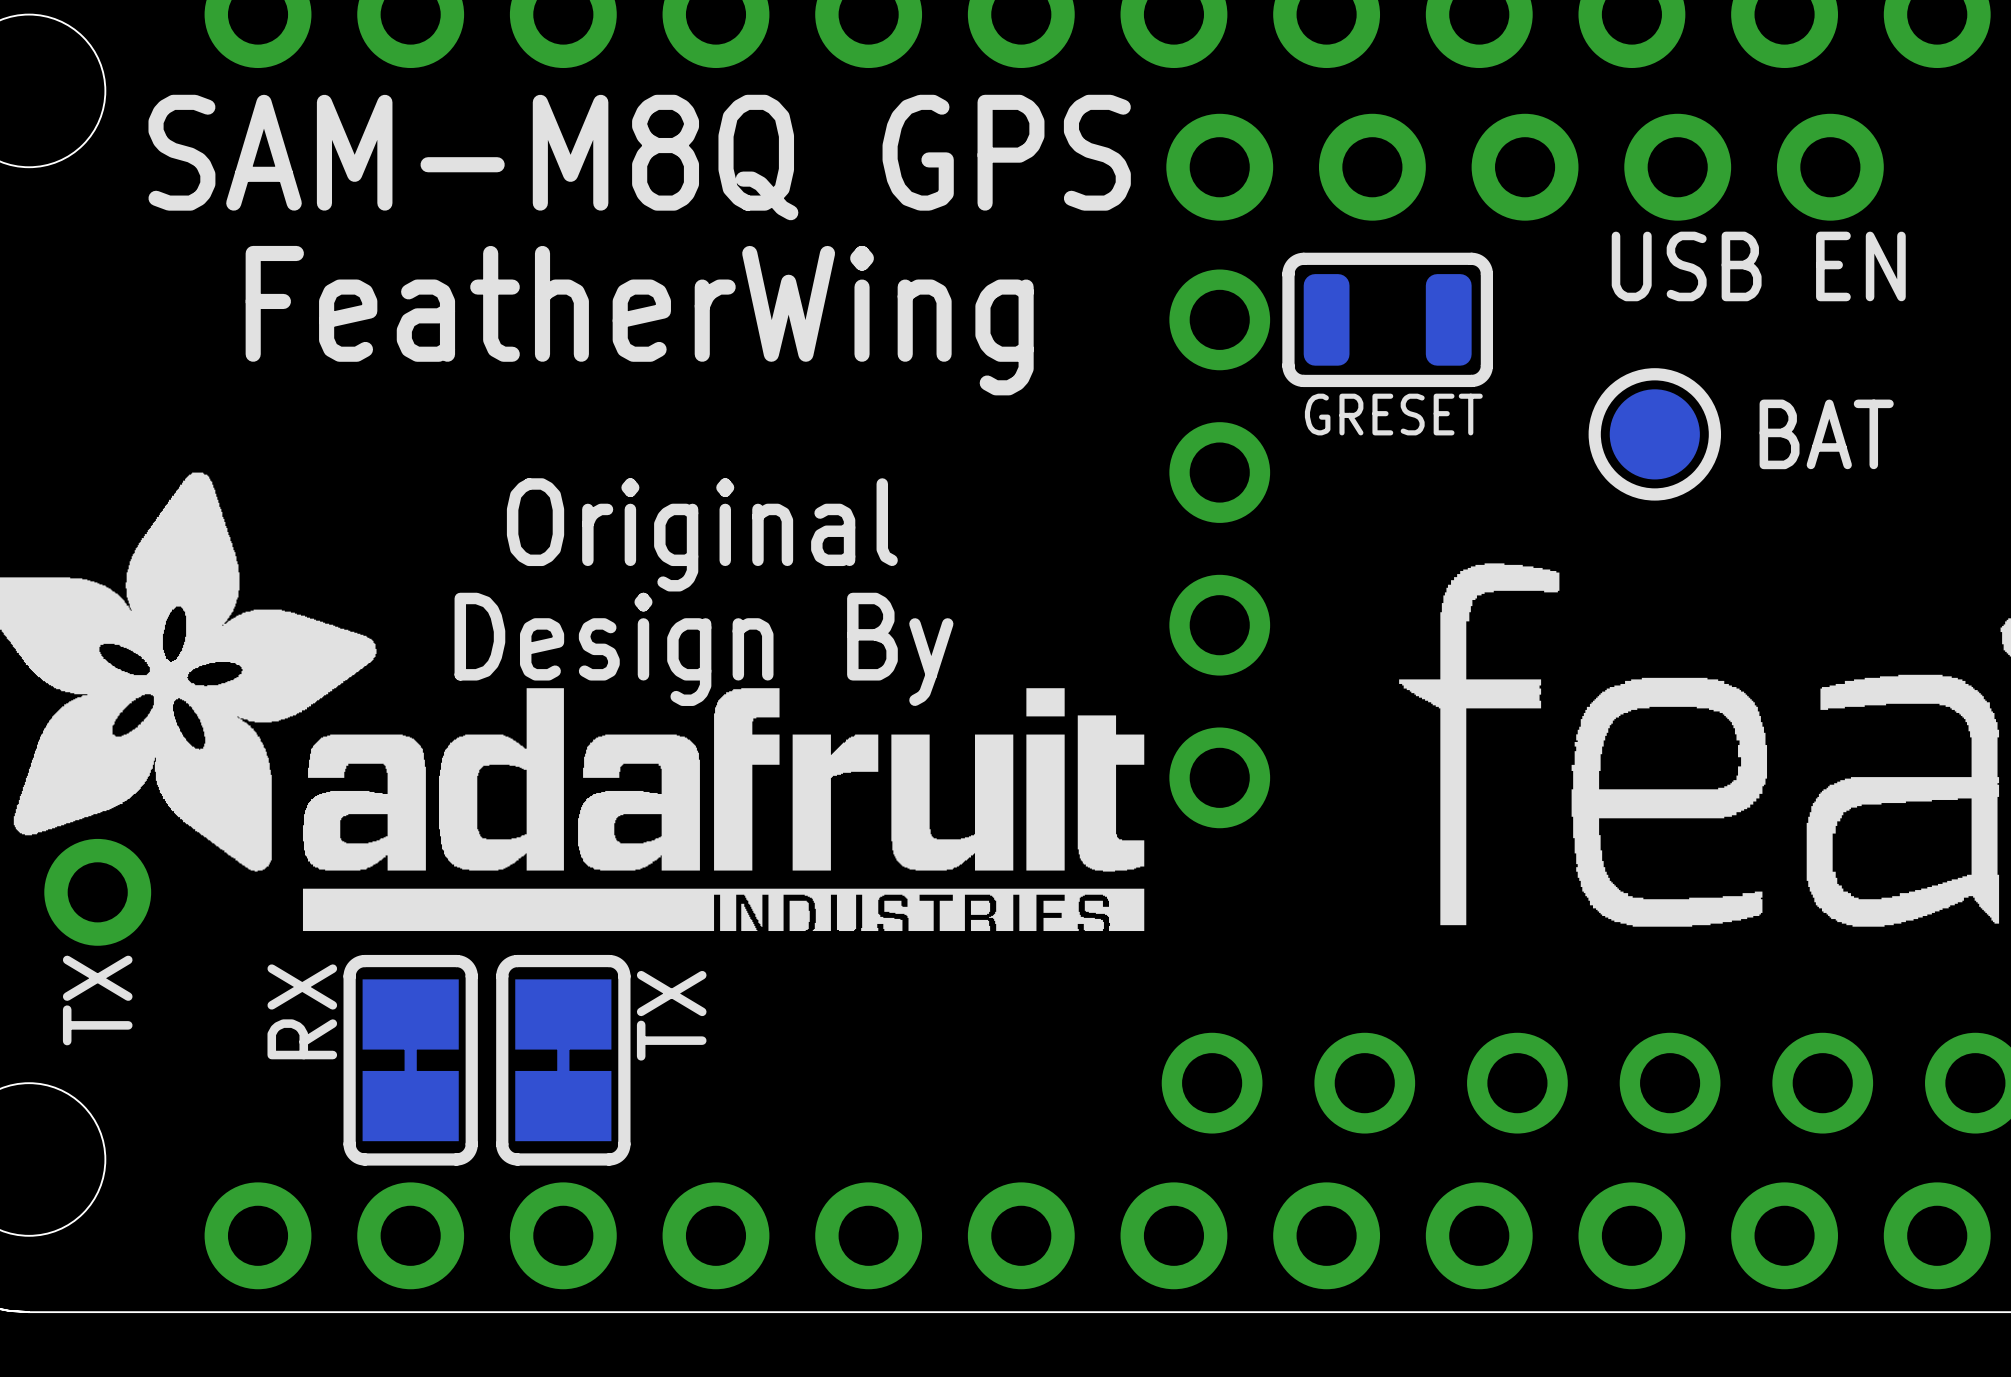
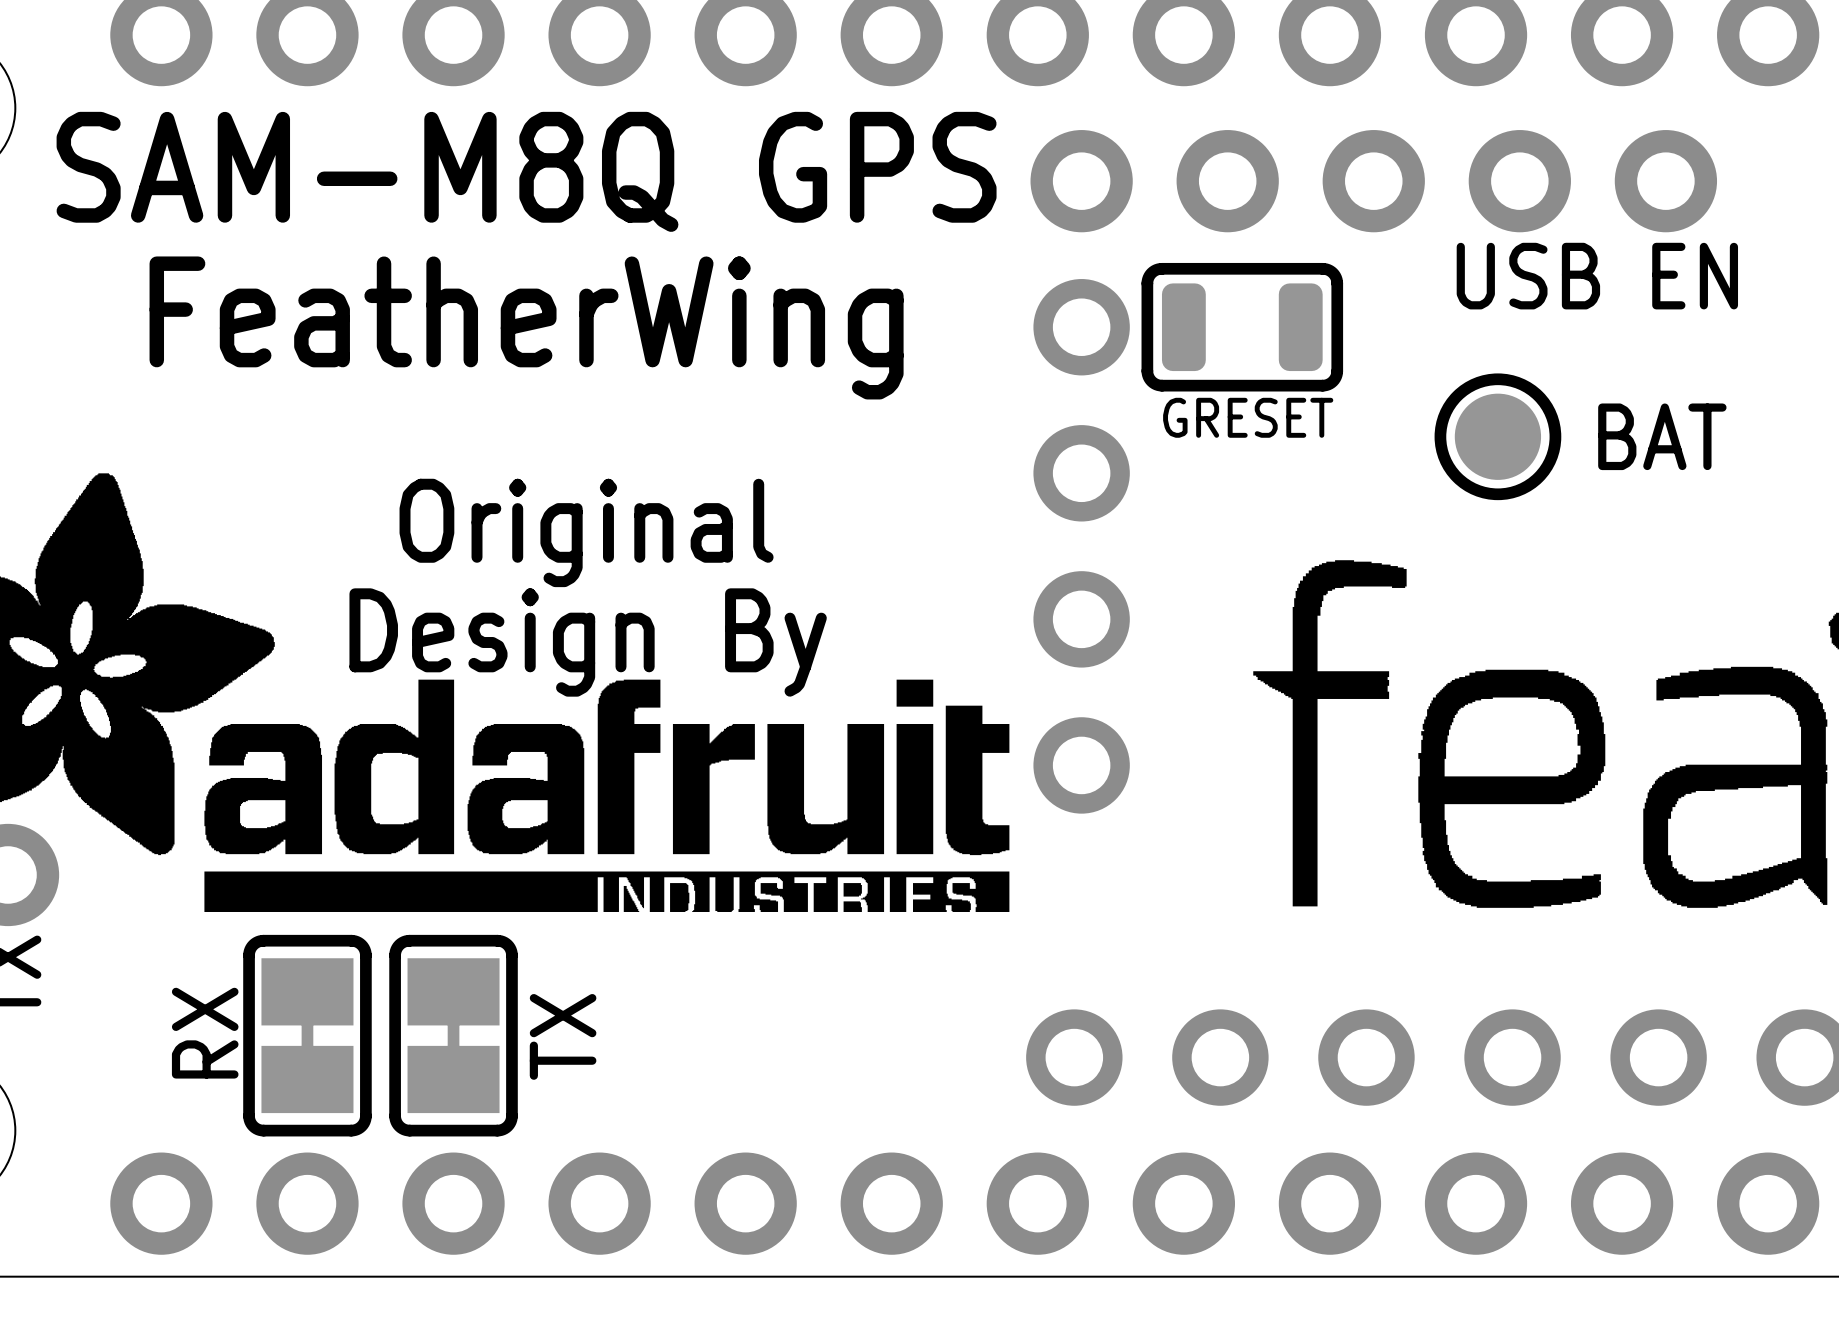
text position: RX (302, 1011) -> RX (205, 1033)
text position: TX (671, 1015) -> TX (563, 1036)

